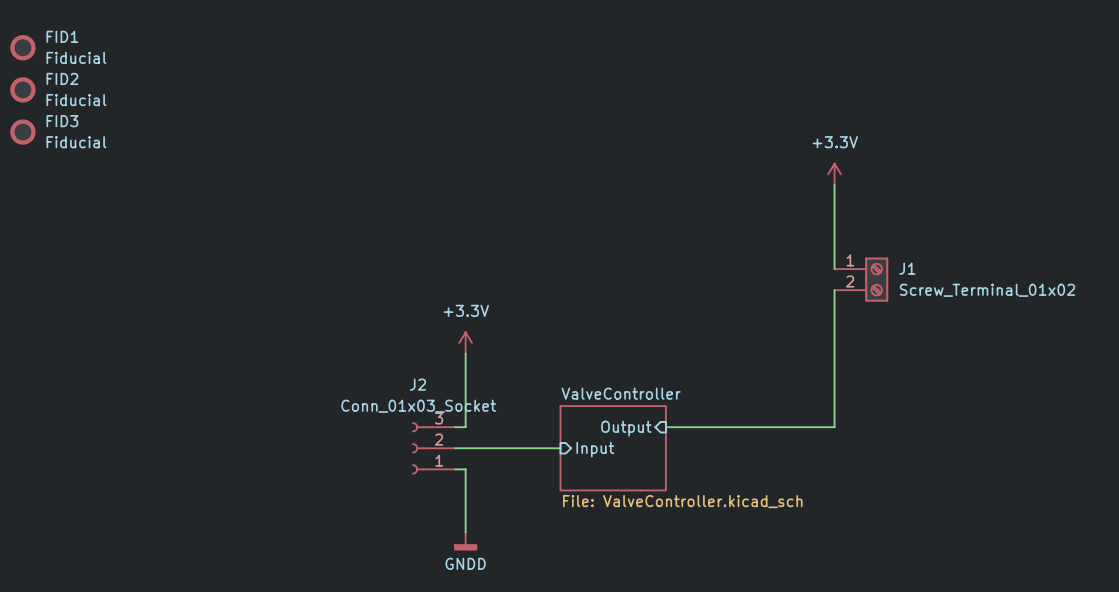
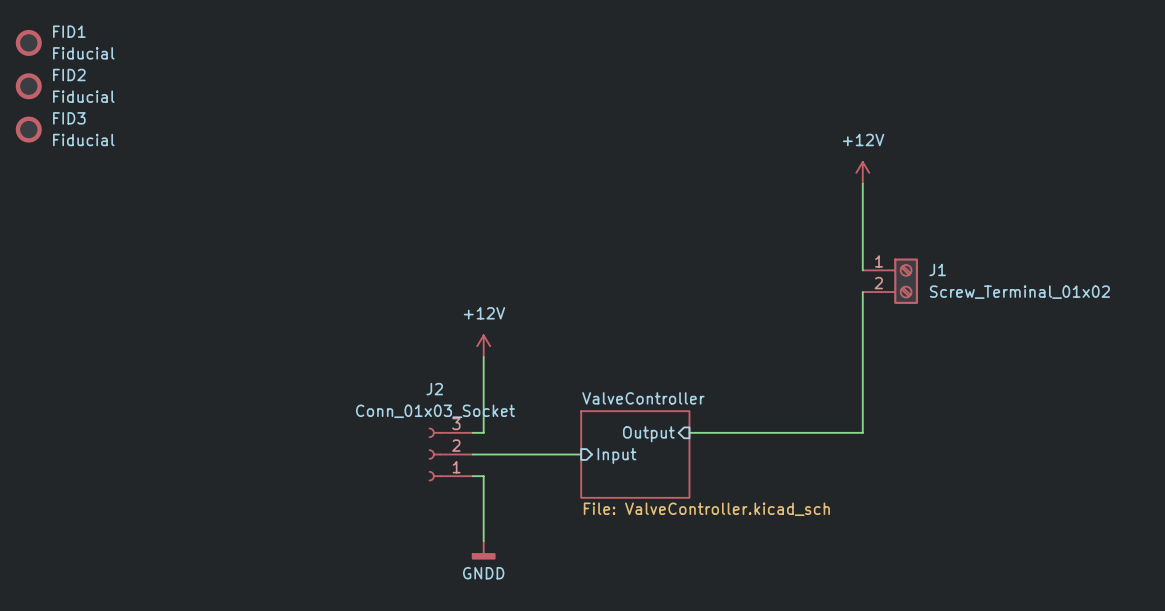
power symbol: +3.3V (834, 174) -> +12V (862, 172)
power symbol: +3.3V (465, 342) -> +12V (483, 346)

